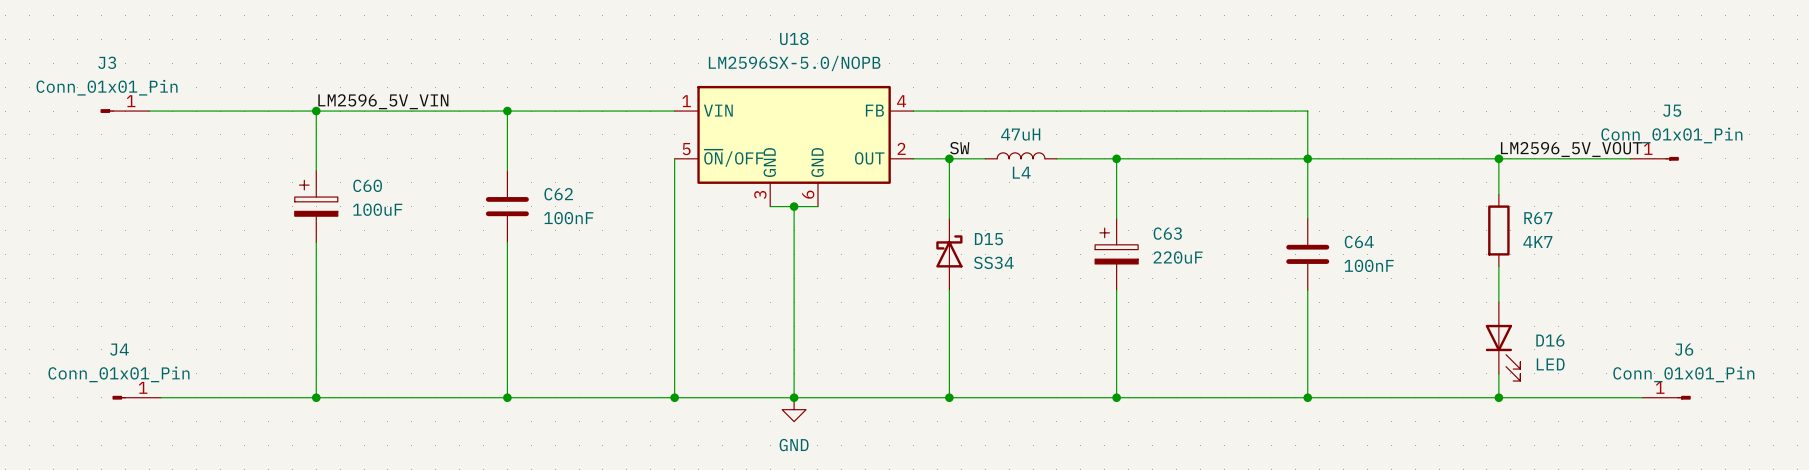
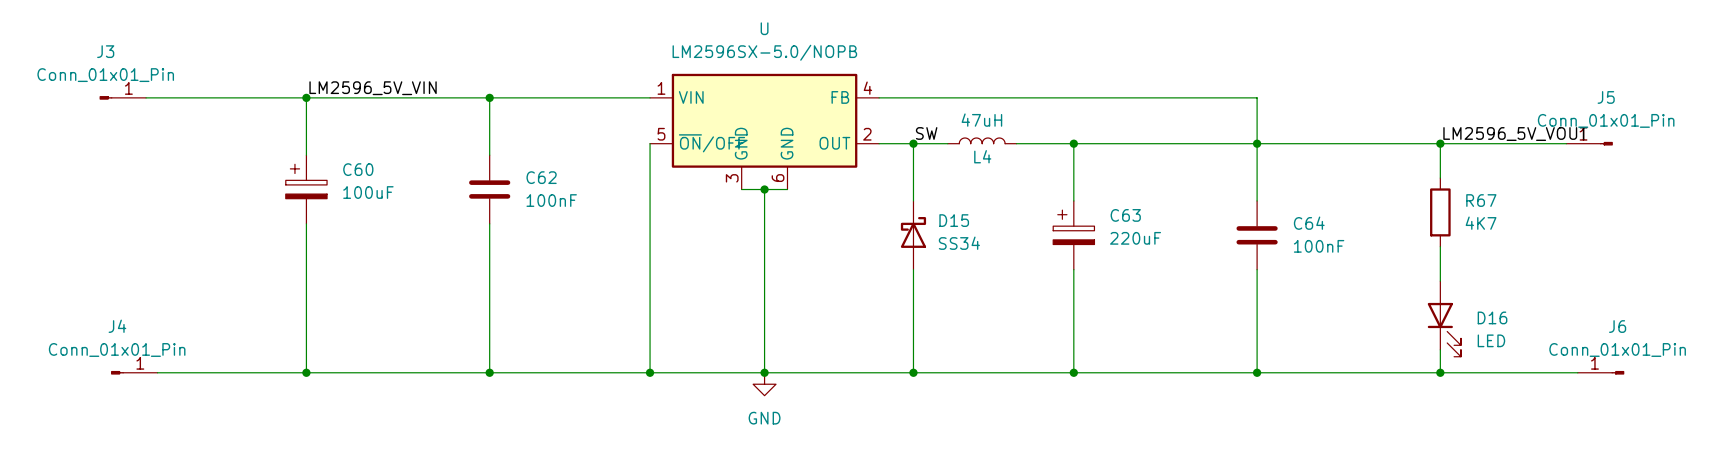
U18 name: U18 (794, 38) -> U (764, 28)

